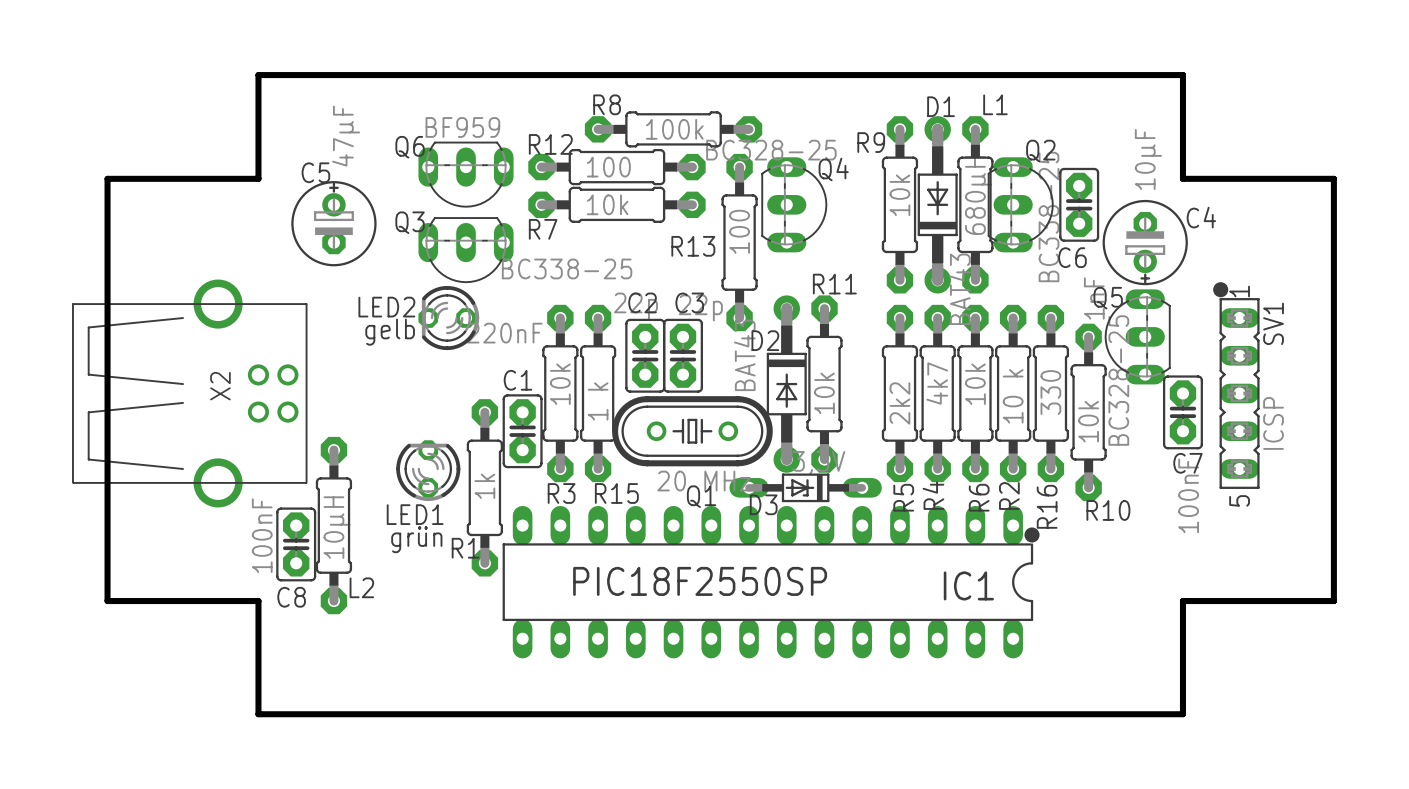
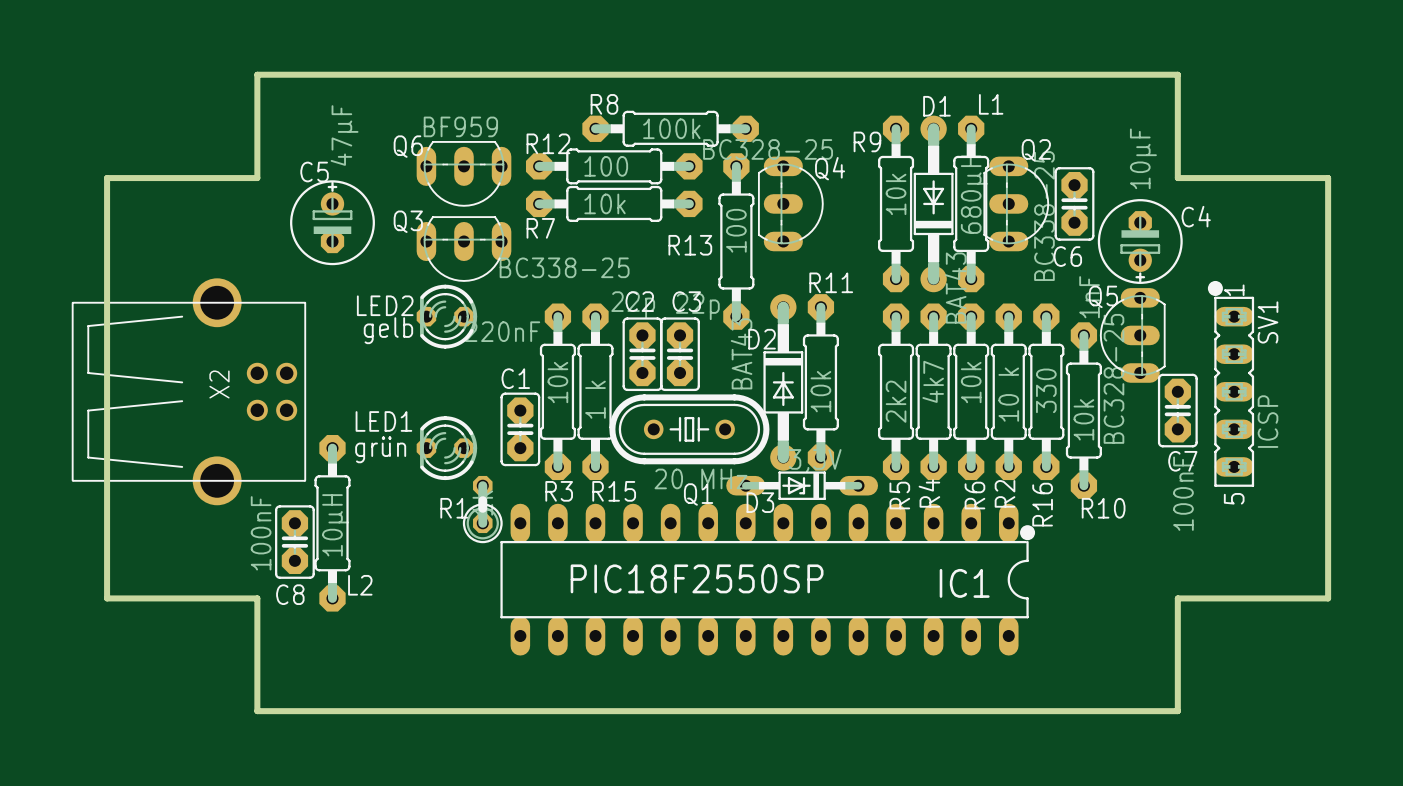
R1 footprint: [466, 399, 503, 577] -> [462, 475, 503, 544]
LED1 rotation: 0° (428, 470) -> 90° counterclockwise (446, 448)
LED1 name position: LED1 (415, 514) -> LED1 (383, 421)
LED1 value position: grün (416, 539) -> grün (380, 449)
R1 name position: R1 (465, 548) -> R1 (454, 508)

